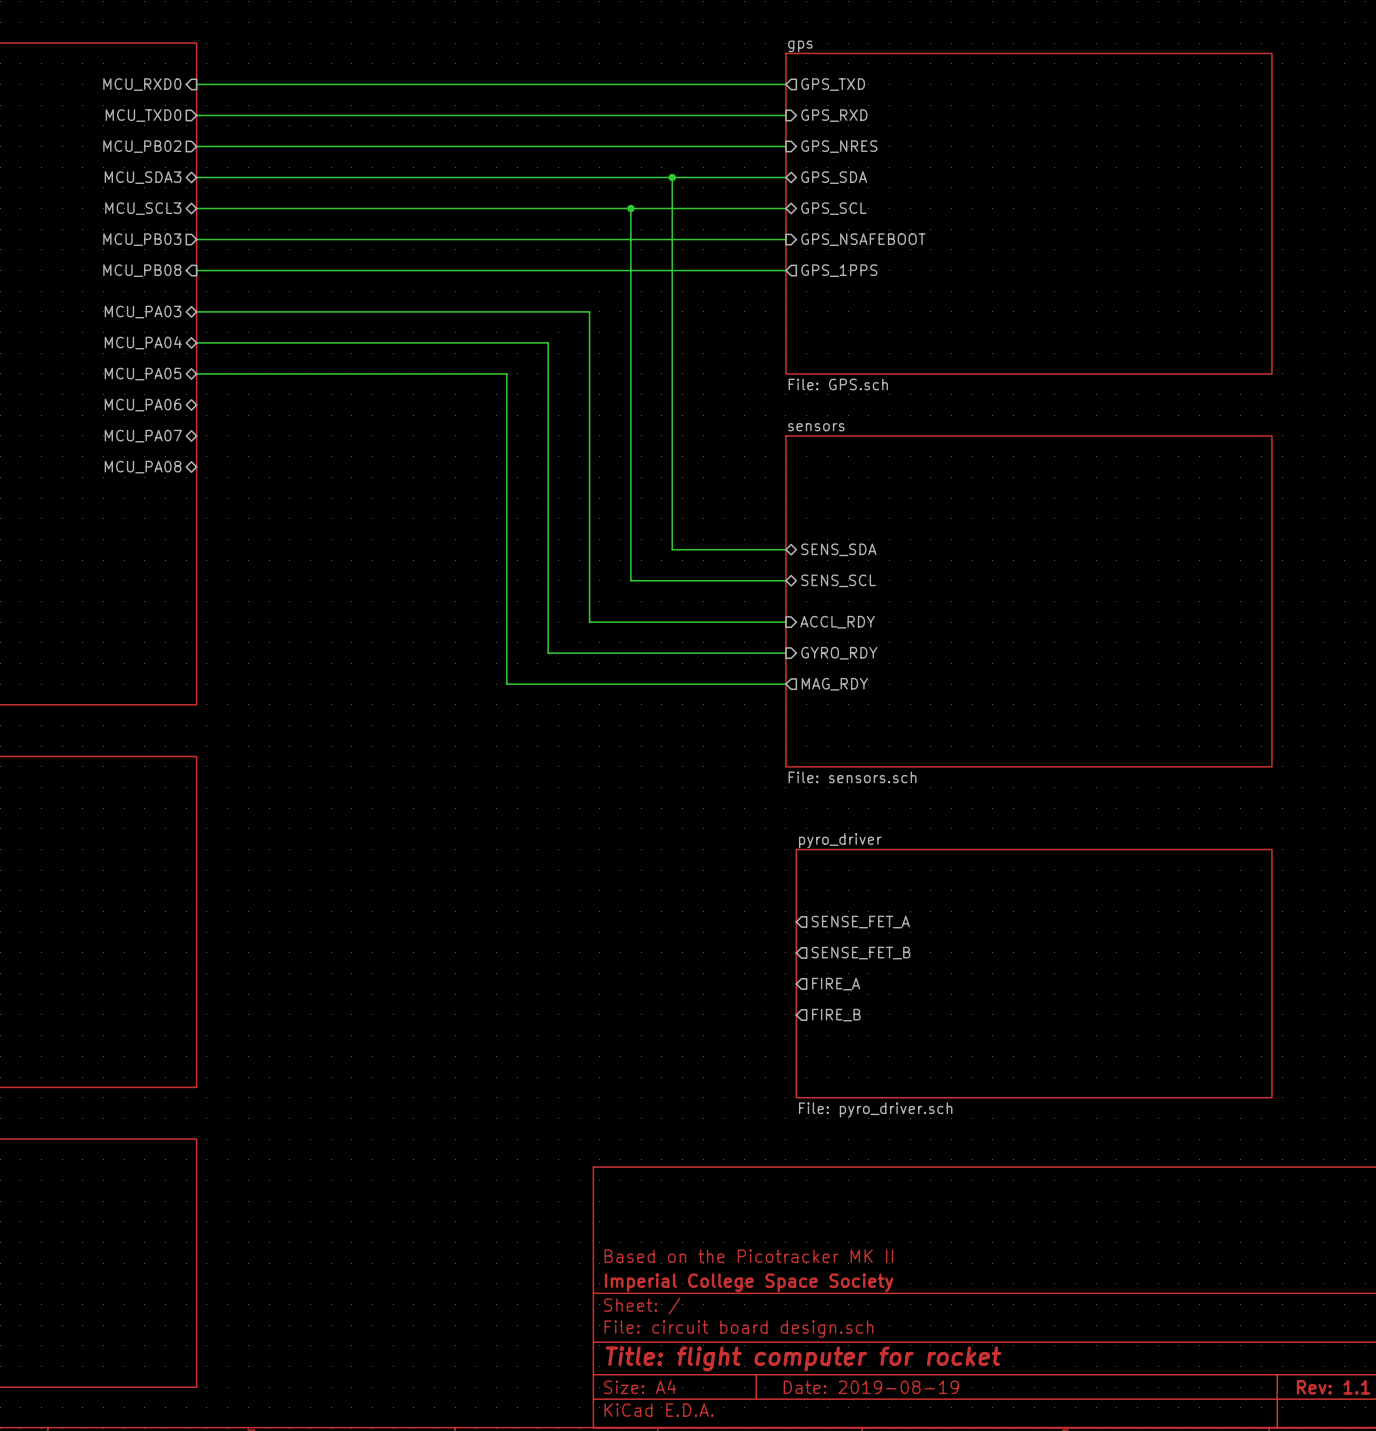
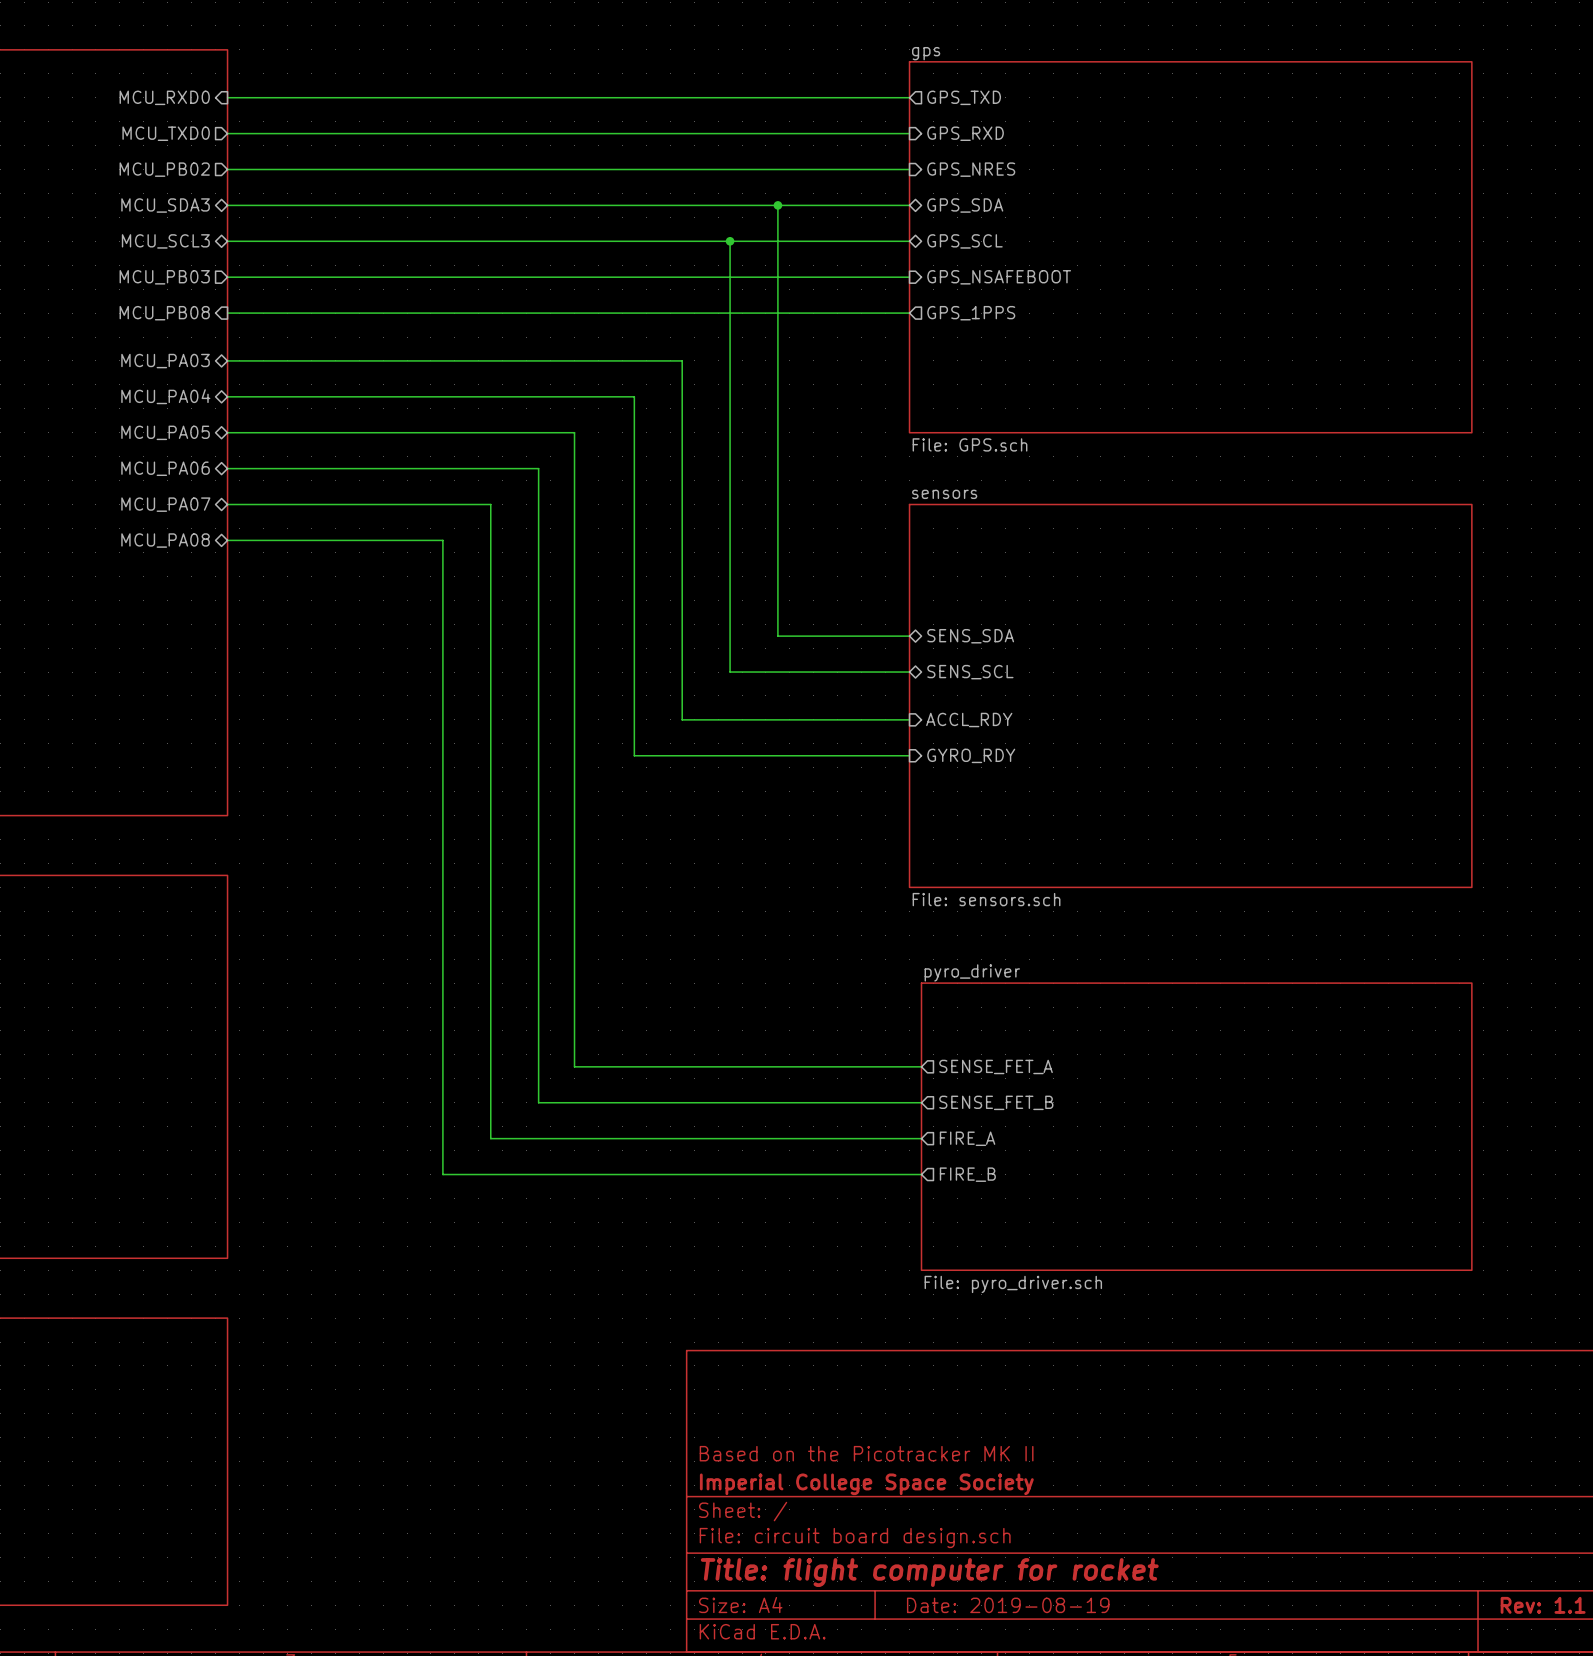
wire: (496, 373) (506, 373) (506, 684) (785, 684) -> (574, 432) (574, 1066) (921, 1066)
wire: none -> (227, 468) (538, 468) (538, 1102) (921, 1102)
wire: none -> (227, 504) (490, 504) (490, 1138) (921, 1138)
wire: none -> (227, 540) (442, 540) (442, 1174) (921, 1174)
sheet pin: MAG_RDY (834, 684) -> none

